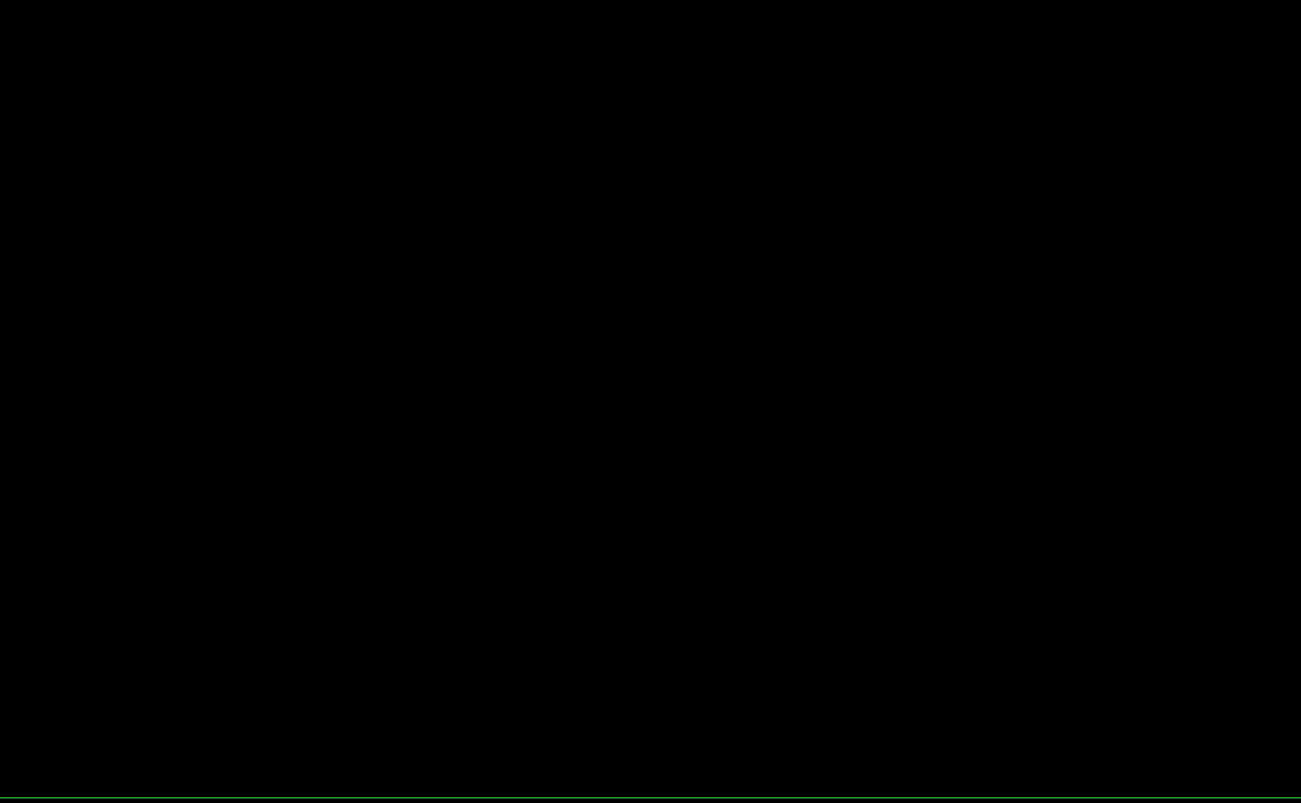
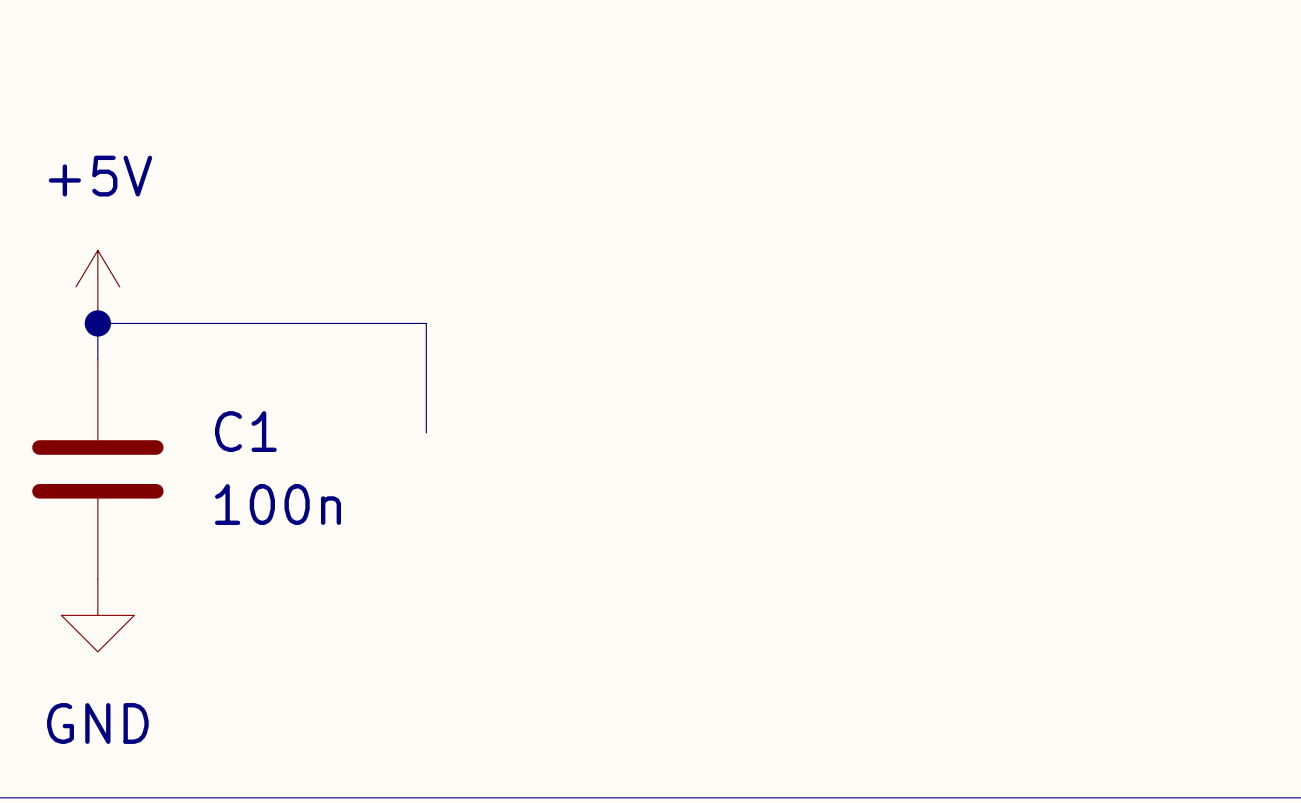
power symbol: none -> +5V (97, 286)
junction: none -> (97, 323)
wire: none -> (97, 359) (97, 323) (426, 323) (426, 432)
C1: none -> 100n (97, 469)
power symbol: none -> GND (97, 615)

